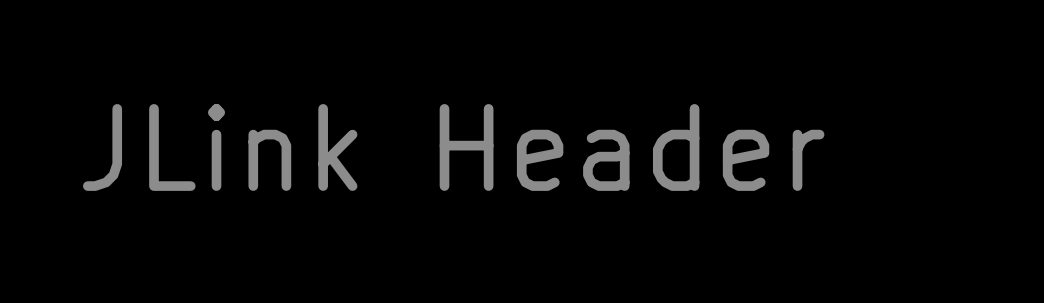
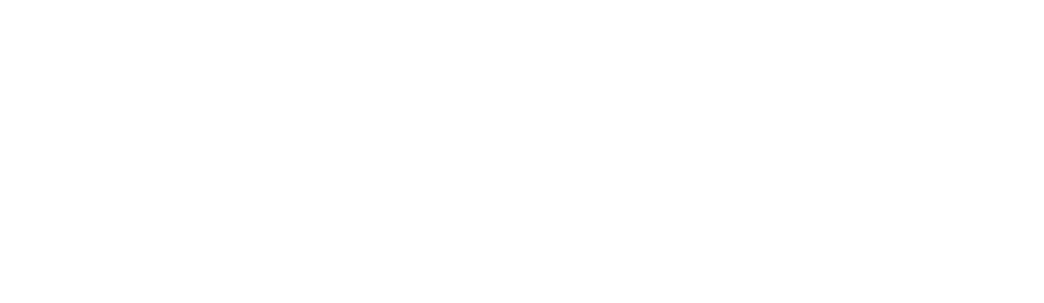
text: JLink Header (453, 147) -> none

